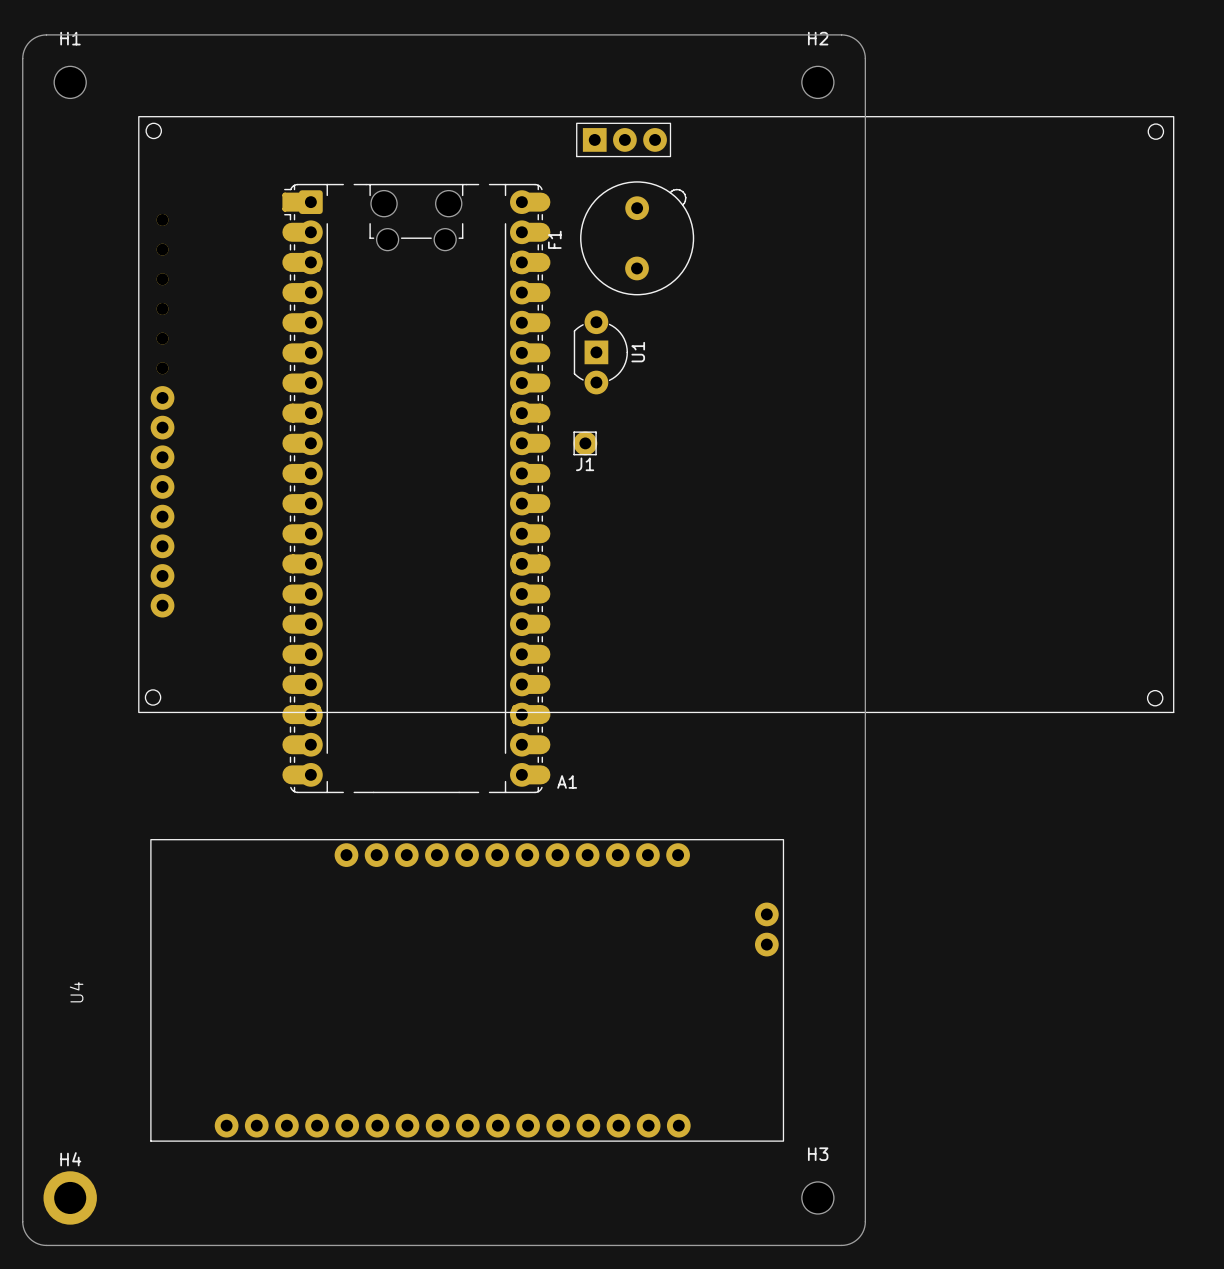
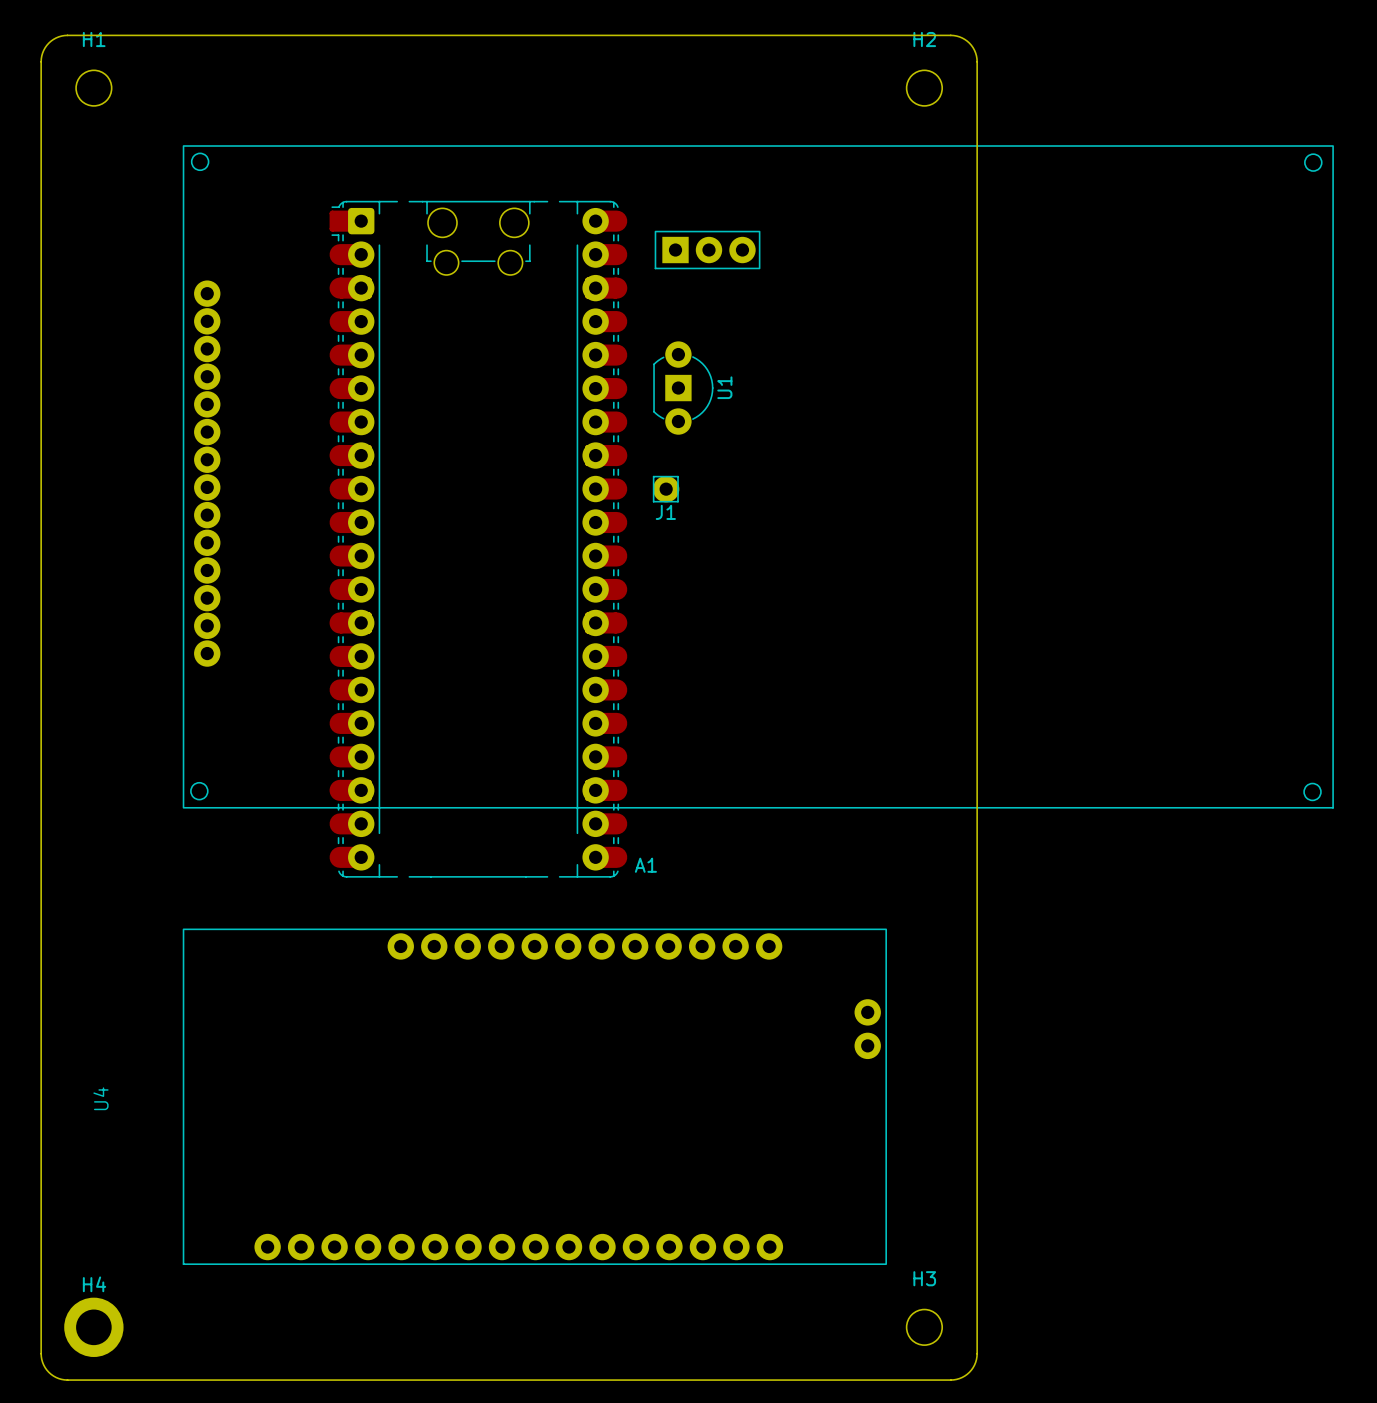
part position: (623, 139) -> (707, 250)
F1: (637, 238) -> none
part: (656, 414) -> none
part: none -> (758, 476)

